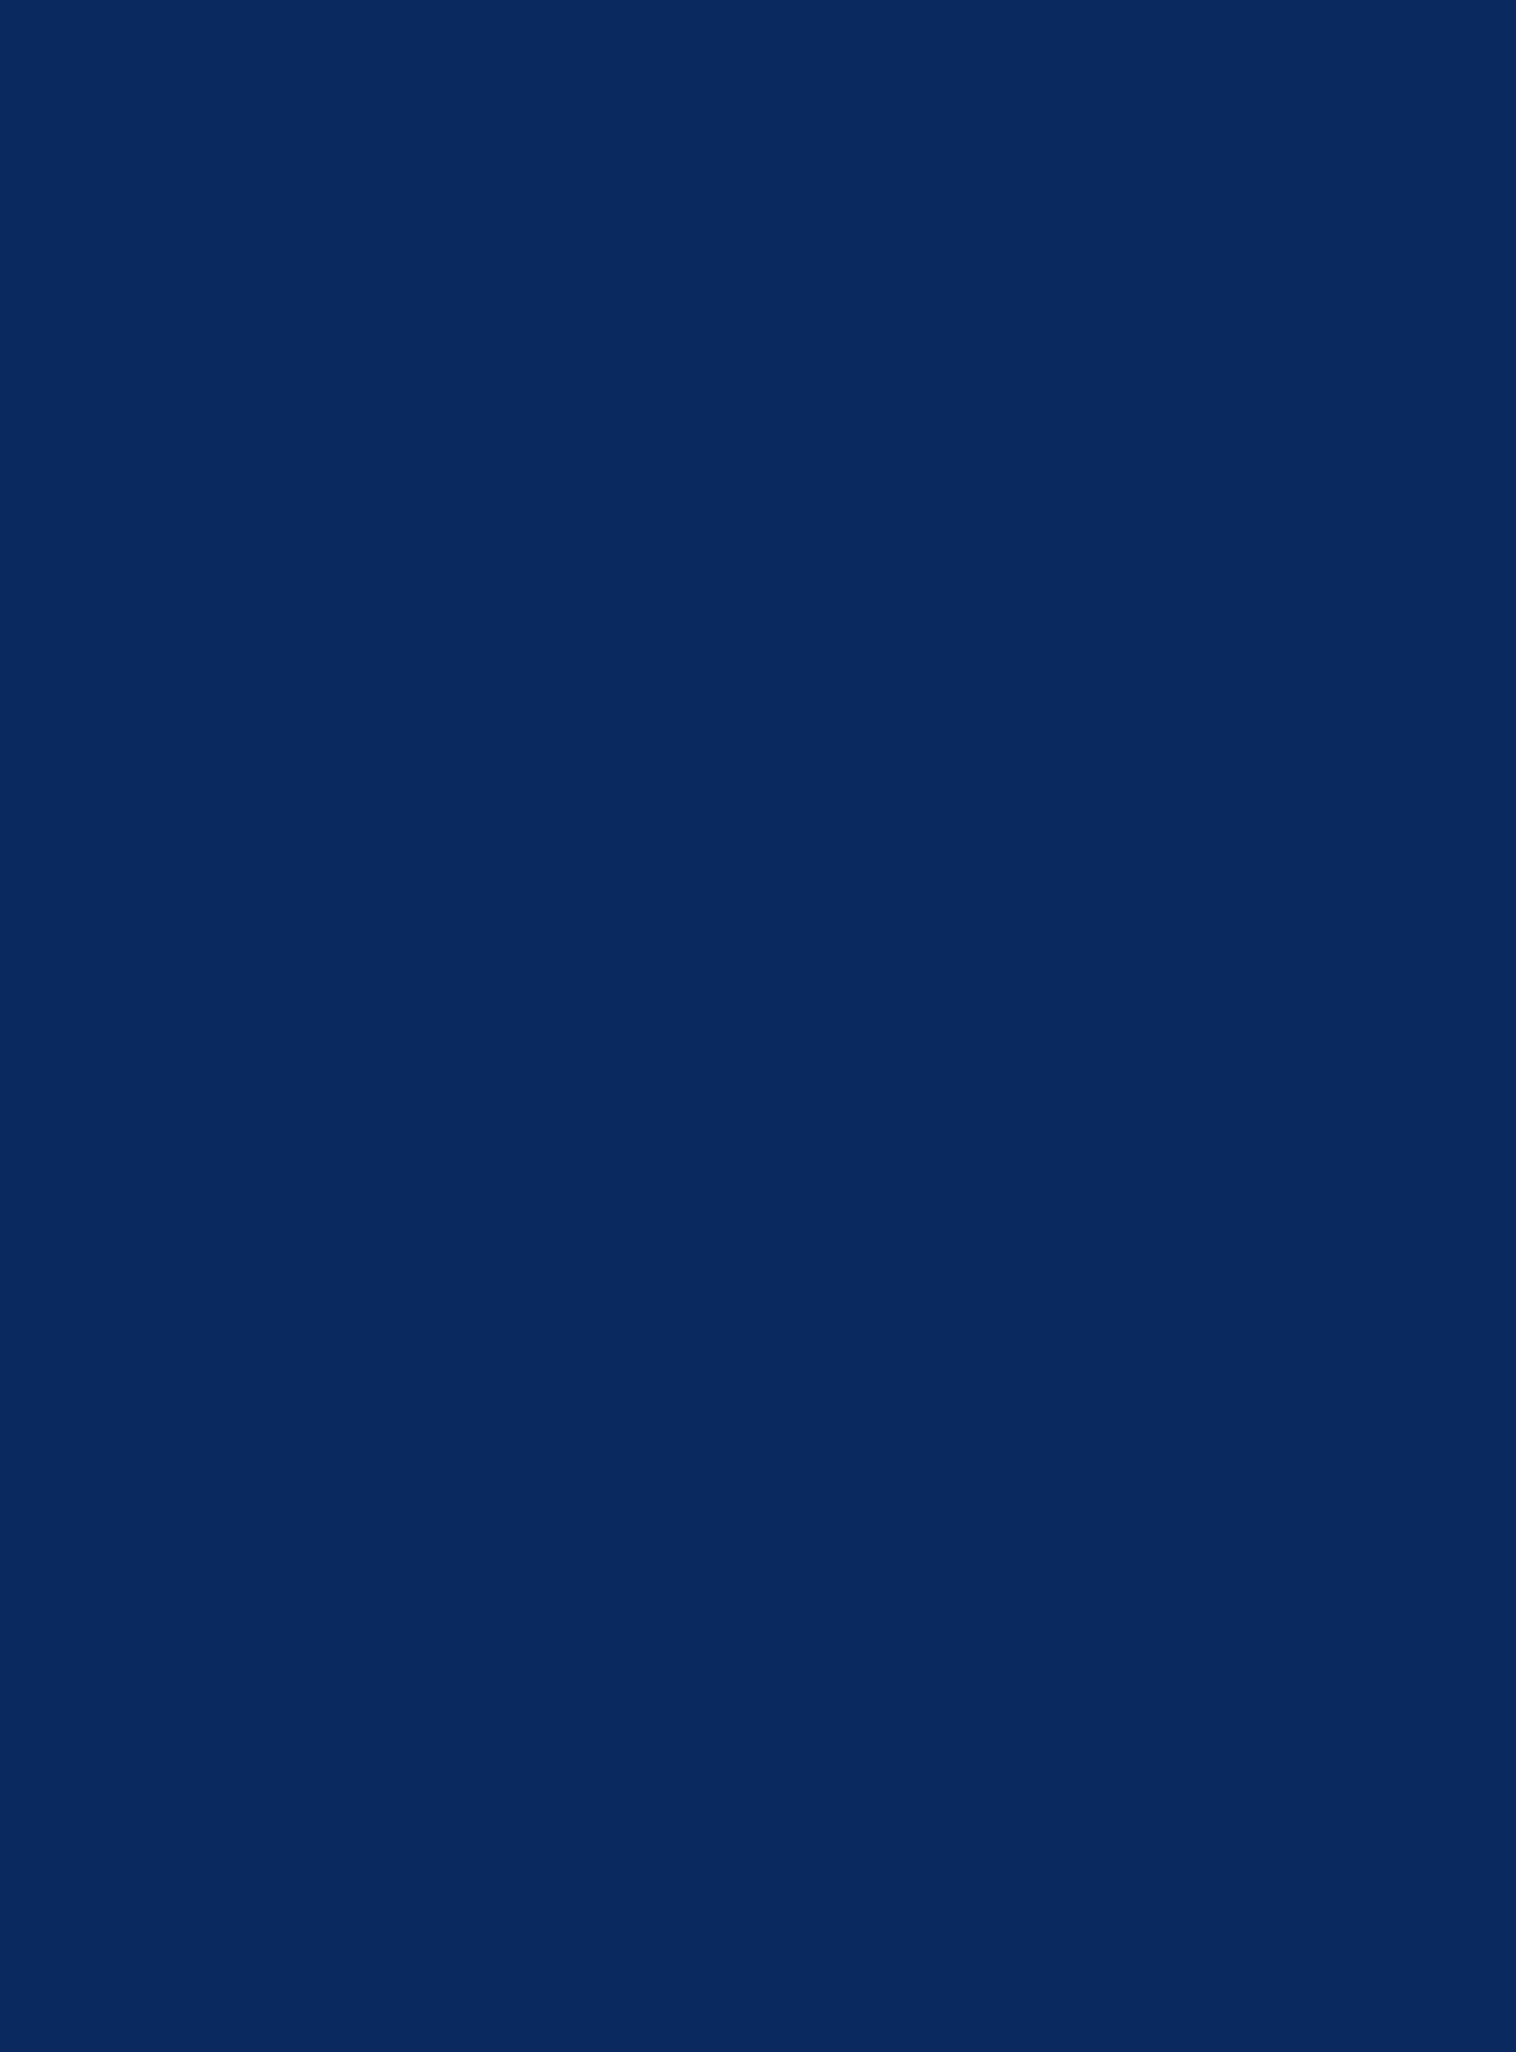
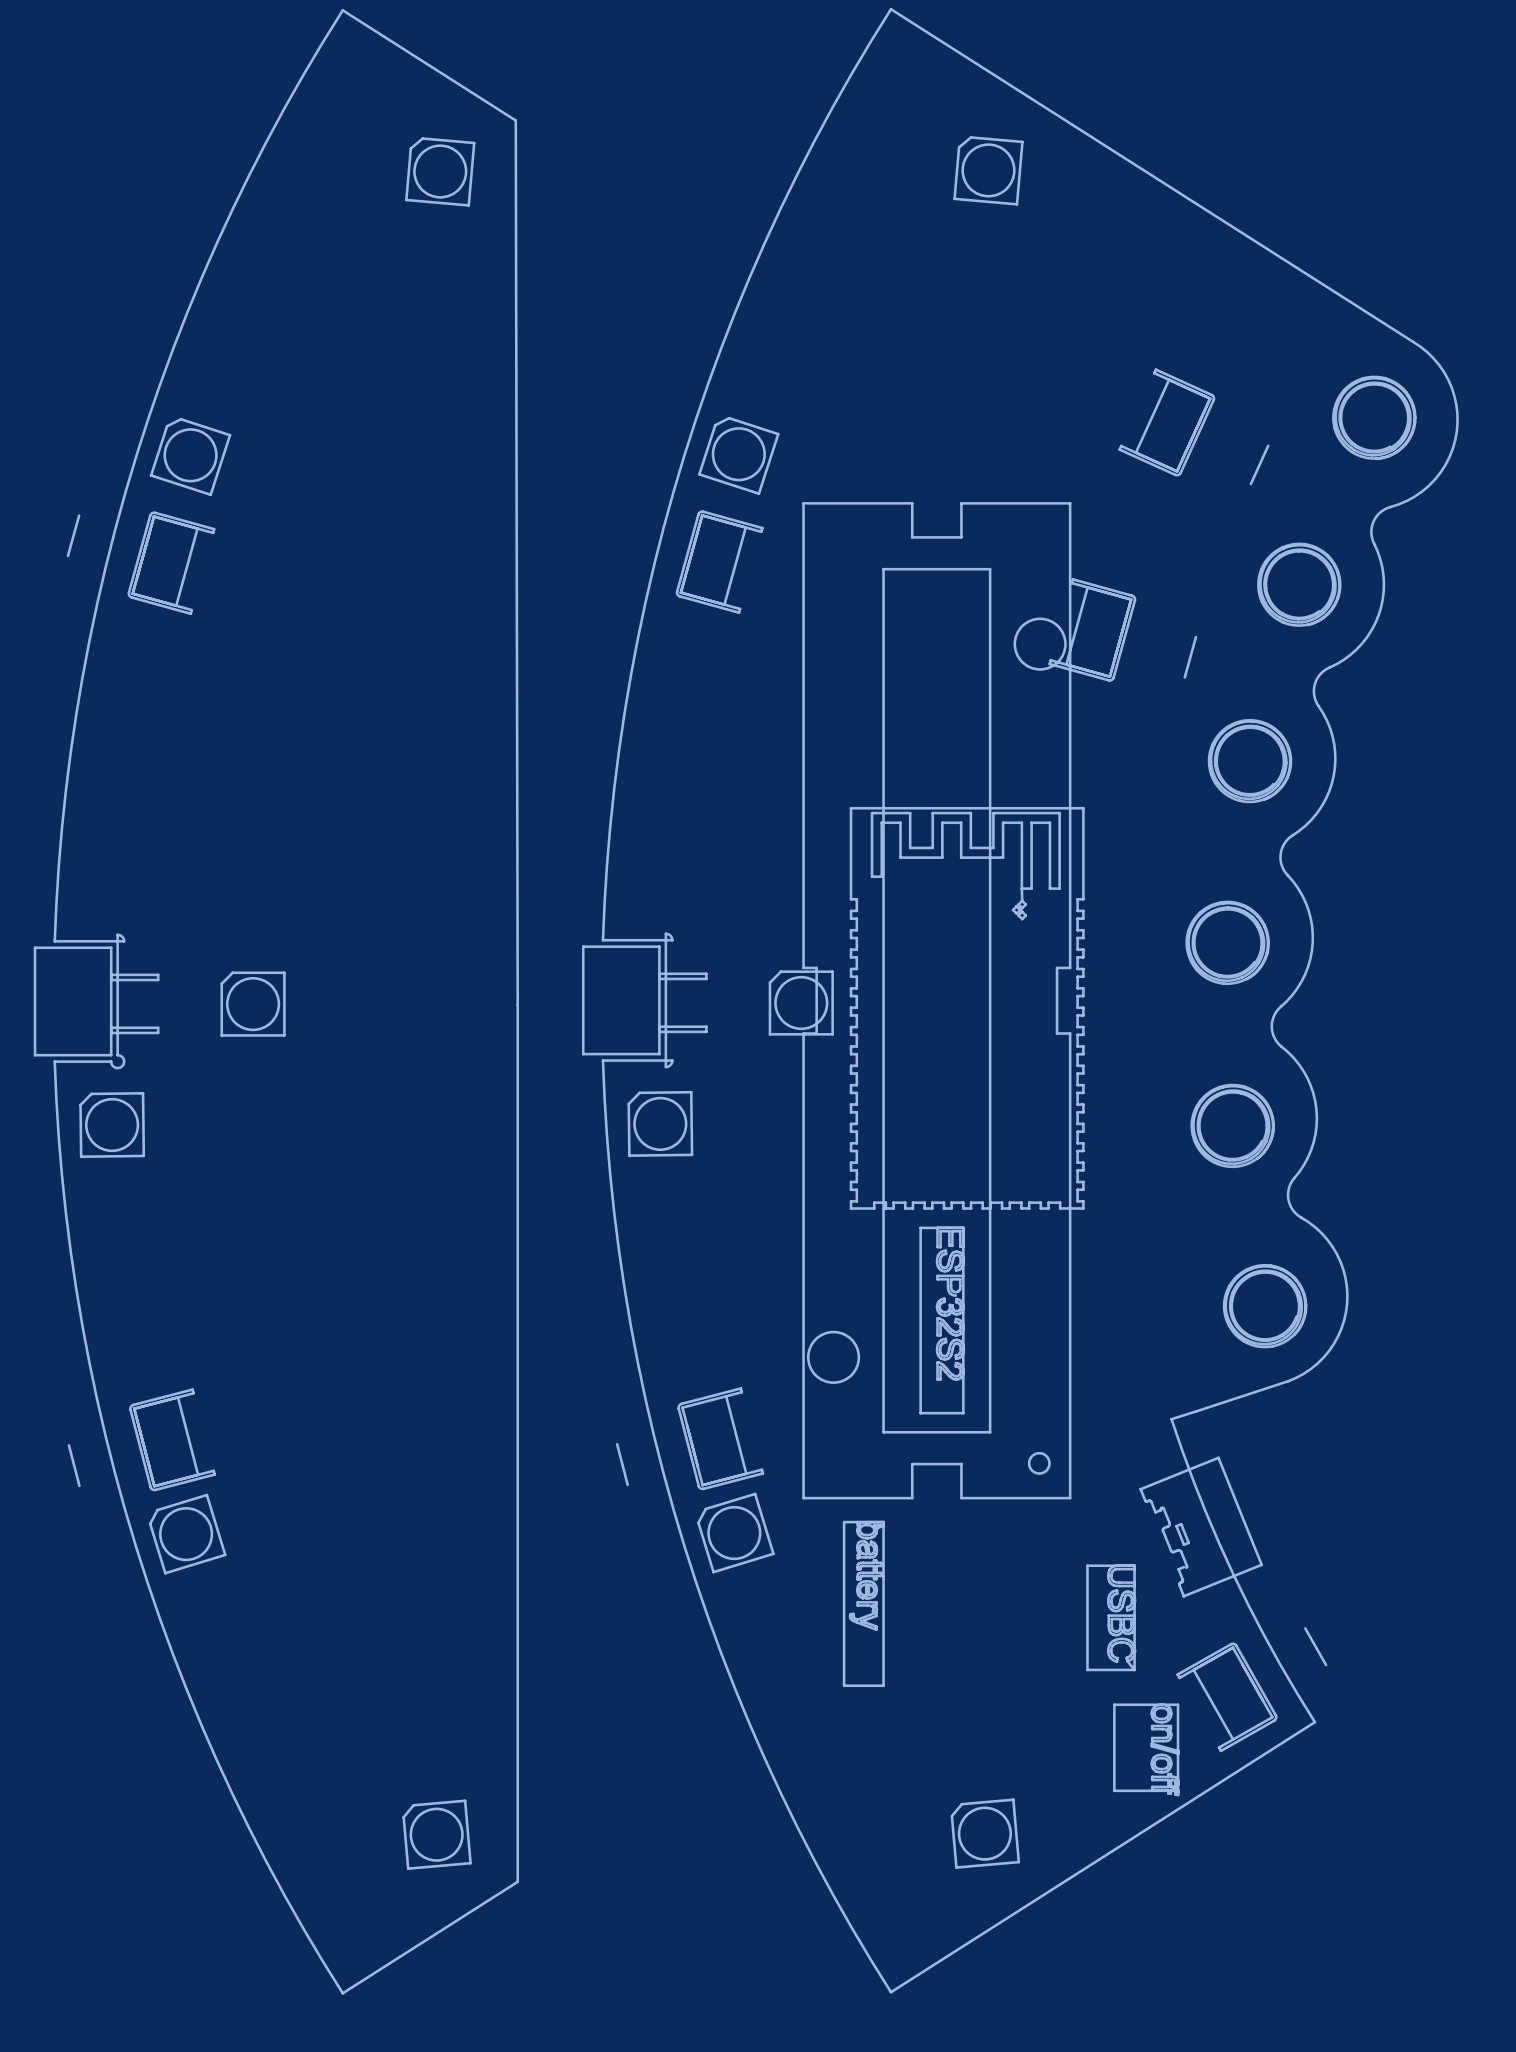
line: none -> (891, 9) (1420, 346) (1439, 365) (1448, 380) (1456, 405) (1457, 423) (1455, 440) (1449, 457) (1435, 479) (1414, 496) (1381, 511) (1373, 521) (1371, 537) (1380, 558) (1383, 574) (1381, 607) (1371, 630) (1362, 643) (1343, 659) (1323, 670) (1315, 681) (1314, 697) (1326, 720) (1334, 743) (1333, 776) (1321, 806) (1305, 825) (1287, 839) (1280, 854) (1283, 869) (1297, 888) (1308, 910) (1312, 942) (1305, 974) (1292, 995) (1274, 1014) (1272, 1030) (1277, 1042) (1293, 1058) (1307, 1078) (1315, 1101) (1316, 1117) (1311, 1150) (1304, 1164) (1290, 1183) (1288, 1199) (1295, 1213) (1315, 1227) (1327, 1239) (1340, 1261) (1345, 1277) (1347, 1294) (1344, 1320) (1338, 1336) (1329, 1350) (1317, 1363) (1303, 1373) (1288, 1381) (1171, 1419) (1194, 1482) (1233, 1575) (1280, 1664) (1314, 1722) (891, 1992) (832, 1894) (780, 1793) (749, 1723) (721, 1653) (684, 1545) (654, 1436) (637, 1361) (624, 1287) (610, 1174) (602, 1060) (672, 1060) (672, 1061) (670, 1065) (665, 1067) (665, 933) (671, 936) (672, 940) (603, 940) (610, 826) (624, 713) (637, 639) (663, 528) (684, 455) (708, 383) (749, 277) (780, 208) (814, 140) (851, 74) (891, 9)
line: none -> (342, 10) (515, 120) (517, 1004) (517, 1881) (342, 1993) (284, 1895) (232, 1794) (201, 1724) (173, 1654) (136, 1546) (115, 1473) (97, 1400) (76, 1288) (61, 1175) (54, 1061) (111, 1061) (112, 1066) (117, 1068) (124, 1062) (122, 1057) (117, 1055) (117, 934) (123, 937) (124, 941) (54, 941) (62, 827) (76, 714) (97, 603) (115, 529) (136, 456) (160, 384) (186, 313) (216, 243) (249, 175) (284, 108) (342, 10)
line: none -> (970, 137) (1022, 141) (1016, 204) (954, 198) (959, 147) (970, 137)
line: none -> (422, 138) (474, 143) (468, 205) (406, 199) (410, 148) (422, 138)
drawing: none -> [961, 143, 1016, 198]
drawing: none -> [413, 144, 468, 199]
line: none -> (1155, 369) (1154, 373) (1210, 398) (1177, 471) (1121, 446) (1119, 449) (1177, 475) (1213, 397) (1155, 369)
line: none -> (1169, 379) (1135, 452)
line: none -> (729, 418) (715, 425) (699, 474) (758, 493) (778, 434) (729, 418)
line: none -> (180, 419) (230, 435) (210, 494) (151, 475) (167, 426) (180, 419)
drawing: none -> [711, 427, 766, 482]
drawing: none -> [163, 428, 218, 483]
line: none -> (1268, 445) (1250, 484)
line: none -> (1394, 449) (1390, 446) (1373, 450) (1359, 447) (1348, 438) (1341, 423) (1342, 407) (1351, 393) (1365, 385) (1383, 385) (1397, 393) (1406, 406) (1407, 422) (1402, 437) (1396, 443) (1393, 445) (1391, 447) (1390, 447) (1389, 448) (1373, 452) (1357, 447) (1345, 437) (1340, 424) (1340, 409) (1345, 398) (1355, 388) (1368, 383) (1382, 383) (1395, 389) (1404, 399) (1410, 413) (1409, 427) (1403, 439) (1394, 449)
line: none -> (1394, 449) (1376, 455) (1358, 451) (1343, 440) (1336, 422) (1337, 404) (1347, 389) (1363, 379) (1382, 378) (1399, 387) (1411, 403) (1414, 424) (1406, 442) (1389, 455) (1370, 458) (1351, 451) (1338, 437) (1333, 421) (1335, 406) (1342, 392) (1354, 381) (1372, 376) (1390, 380) (1405, 391) (1413, 407) (1414, 424) (1407, 441) (1394, 453) (1384, 457) (1376, 458)
line: none -> (803, 503) (912, 503) (912, 537) (961, 537) (961, 503) (1070, 503) (1070, 967) (1057, 967) (1057, 1033) (1070, 1033) (1070, 1498) (961, 1498) (961, 1464) (912, 1464) (912, 1498) (803, 1498) (803, 1033) (816, 1033) (816, 967) (803, 967) (803, 503)
line: none -> (703, 511) (762, 528) (761, 531) (702, 515) (680, 592) (740, 608) (739, 612) (680, 596) (677, 593) (698, 514) (703, 511)
line: none -> (155, 512) (214, 529) (213, 532) (153, 516) (132, 593) (191, 610) (190, 613) (131, 597) (129, 594) (150, 515) (155, 512)
line: none -> (79, 515) (67, 556)
line: none -> (745, 527) (724, 604)
line: none -> (197, 528) (176, 605)
line: none -> (883, 569) (990, 569) (990, 1432) (883, 1432) (883, 569)
line: none -> (1073, 579) (1072, 583) (1131, 599) (1109, 676) (1050, 660) (1049, 664) (1111, 680) (1134, 598) (1073, 579)
line: none -> (1087, 587) (1066, 664)
line: none -> (1319, 611) (1303, 617) (1285, 614) (1272, 604) (1266, 588) (1268, 571) (1278, 558) (1295, 551) (1312, 553) (1325, 564) (1332, 580) (1330, 597) (1319, 612) (1304, 618) (1286, 617) (1272, 606) (1265, 590) (1266, 573) (1276, 558) (1292, 550) (1309, 551) (1325, 560) (1334, 577) (1333, 596) (1323, 612) (1306, 621) (1288, 621) (1271, 611) (1262, 595) (1261, 577) (1268, 560) (1282, 549) (1301, 545) (1319, 550) (1334, 565) (1339, 585) (1334, 604) (1320, 619) (1301, 625) (1281, 621) (1266, 609) (1259, 594) (1258, 579) (1263, 564) (1274, 552) (1291, 544) (1309, 545) (1325, 553) (1336, 568) (1340, 585) (1335, 603) (1324, 617) (1315, 622) (1307, 625)
drawing: none -> [1013, 617, 1067, 671]
line: none -> (1195, 637) (1184, 677)
line: none -> (1271, 787) (1273, 784) (1260, 792) (1247, 794) (1234, 790) (1225, 783) (1218, 771) (1216, 758) (1220, 746) (1228, 735) (1239, 729) (1253, 727) (1266, 731) (1276, 739) (1282, 750) (1283, 764) (1280, 776) (1271, 787)
line: none -> (1271, 787) (1255, 795) (1238, 793) (1223, 783) (1215, 767) (1216, 751) (1226, 735) (1241, 726) (1258, 726) (1276, 736) (1285, 753) (1284, 771) (1275, 788) (1258, 797) (1239, 797) (1222, 788) (1213, 772) (1211, 754) (1218, 737) (1233, 725) (1250, 721) (1269, 726) (1284, 740) (1290, 760) (1285, 780) (1271, 795) (1252, 801) (1232, 798) (1217, 786) (1210, 771) (1209, 756) (1214, 741) (1223, 729) (1239, 721) (1257, 720) (1273, 727) (1285, 740) (1290, 757) (1288, 776) (1283, 784) (1278, 790) (1271, 796) (1263, 799)
line: none -> (851, 808) (851, 899) (856, 899) (856, 910) (851, 910) (851, 918) (856, 918) (856, 930) (851, 930) (851, 938) (856, 938) (856, 949) (851, 949) (851, 957) (856, 957) (856, 968) (851, 968) (851, 976) (856, 976) (856, 988) (851, 988) (851, 996) (856, 996) (856, 1007) (851, 1007) (851, 1015) (856, 1015) (856, 1027) (851, 1027) (851, 1034) (856, 1034) (856, 1046) (851, 1046) (851, 1054) (856, 1054) (856, 1065) (851, 1065) (851, 1073) (856, 1073) (856, 1085) (851, 1085) (851, 1092) (856, 1092) (856, 1104) (851, 1104) (851, 1112) (856, 1112) (856, 1123) (851, 1123) (851, 1131) (856, 1131) (856, 1143) (851, 1143) (851, 1151) (856, 1151) (856, 1162) (851, 1162) (851, 1170) (856, 1170) (856, 1182) (851, 1182) (851, 1189) (856, 1189) (856, 1201) (851, 1201) (851, 1208) (874, 1208) (874, 1202) (885, 1202) (885, 1208) (893, 1208) (893, 1202) (905, 1202) (905, 1208) (912, 1208) (912, 1202) (924, 1202) (924, 1208) (932, 1208) (932, 1202) (943, 1202) (943, 1208) (951, 1208) (951, 1202) (963, 1202) (963, 1208) (971, 1208) (971, 1202) (982, 1202) (982, 1208) (990, 1208) (990, 1202) (1002, 1202) (1002, 1208) (1009, 1208) (1009, 1202) (1021, 1202) (1021, 1208) (1029, 1208) (1029, 1202) (1040, 1202) (1040, 1208) (1048, 1208) (1048, 1202) (1060, 1202) (1060, 1208) (1083, 1208) (1083, 1201) (1077, 1201) (1077, 1189) (1083, 1189) (1083, 1182) (1077, 1182) (1077, 1170) (1083, 1170) (1083, 1162) (1077, 1162) (1077, 1151) (1083, 1151) (1083, 1143) (1077, 1143) (1077, 1131) (1083, 1131) (1083, 1123) (1077, 1123) (1077, 1112) (1083, 1112) (1083, 1104) (1077, 1104) (1077, 1092) (1083, 1092) (1083, 1085) (1077, 1085) (1077, 1073) (1083, 1073) (1083, 1065) (1077, 1065) (1077, 1054) (1083, 1054) (1083, 1046) (1077, 1046) (1077, 1034) (1083, 1034) (1083, 1027) (1077, 1027) (1077, 1015) (1083, 1015) (1083, 1007) (1077, 1007) (1077, 996) (1083, 996) (1083, 988) (1077, 988) (1077, 976) (1083, 976) (1083, 968) (1077, 968) (1077, 957) (1083, 957) (1083, 949) (1077, 949) (1077, 938) (1083, 938) (1083, 930) (1077, 930) (1077, 918) (1083, 918) (1083, 910) (1077, 910) (1077, 899) (1083, 899) (1083, 808) (851, 808)
line: none -> (1021, 888) (1021, 822) (1003, 822) (1003, 857) (961, 857) (961, 822) (942, 822) (942, 857) (900, 857) (900, 822) (881, 822) (881, 876) (872, 876) (872, 813) (910, 813) (910, 847) (932, 847) (932, 813) (970, 813) (970, 847) (993, 847) (993, 813) (1059, 813) (1059, 888) (1049, 888) (1049, 822) (1031, 822) (1031, 888) (1021, 888)
line: none -> (1021, 888) (1022, 900)
line: none -> (1022, 900) (1013, 910) (1016, 913) (1020, 910)
line: none -> (1022, 900) (1025, 904) (1022, 908) (1018, 904)
line: none -> (1016, 906) (1025, 915) (1022, 919) (1018, 915) (1022, 911)
line: none -> (583, 946) (583, 1054) (659, 1054) (659, 946) (583, 946)
line: none -> (35, 947) (111, 947) (111, 1055) (35, 1055) (35, 947)
line: none -> (1254, 962) (1241, 973) (1223, 975) (1207, 969) (1196, 955) (1194, 939) (1200, 923) (1214, 912) (1230, 909) (1247, 915) (1258, 929) (1261, 946) (1255, 962) (1242, 973) (1225, 977) (1208, 971) (1196, 958) (1192, 942) (1197, 924) (1210, 912) (1227, 907) (1245, 912) (1259, 925) (1264, 943) (1258, 962) (1245, 975) (1228, 980) (1209, 976) (1195, 964) (1188, 947) (1190, 929) (1201, 913) (1217, 904) (1237, 904) (1255, 913) (1266, 931) (1267, 951) (1257, 969) (1241, 981) (1221, 983) (1204, 976) (1192, 963) (1187, 949) (1187, 933) (1194, 919) (1208, 906) (1225, 902) (1243, 905) (1258, 916) (1266, 931) (1268, 950) (1261, 966) (1254, 974) (1247, 979)
line: none -> (780, 971) (769, 982) (769, 1034) (832, 1034) (832, 971) (780, 971)
line: none -> (232, 972) (284, 972) (284, 1035) (221, 1035) (221, 983) (232, 972)
line: none -> (659, 973) (706, 973) (706, 978) (659, 978)
line: none -> (111, 974) (158, 974) (158, 980) (111, 980)
drawing: none -> [774, 975, 829, 1031]
drawing: none -> [225, 976, 281, 1032]
line: none -> (659, 1026) (706, 1026) (706, 1031) (659, 1031)
line: none -> (111, 1027) (158, 1027) (158, 1032) (111, 1032)
line: none -> (691, 1092) (639, 1092) (628, 1104) (629, 1155) (692, 1154) (691, 1092)
line: none -> (143, 1093) (91, 1093) (80, 1105) (81, 1156) (143, 1155) (143, 1093)
drawing: none -> [633, 1096, 688, 1152]
drawing: none -> [84, 1097, 140, 1153]
line: none -> (1262, 1141) (1250, 1153) (1233, 1159) (1217, 1155) (1204, 1143) (1199, 1127) (1202, 1110) (1214, 1097) (1230, 1092) (1247, 1095) (1261, 1107) (1266, 1124) (1263, 1141) (1252, 1154) (1235, 1160) (1217, 1157) (1204, 1145) (1198, 1130) (1200, 1111) (1211, 1097) (1227, 1090) (1245, 1092) (1261, 1104) (1268, 1121) (1266, 1140) (1255, 1155) (1238, 1163) (1219, 1161) (1204, 1151) (1195, 1135) (1194, 1117) (1202, 1101) (1217, 1089) (1236, 1086) (1255, 1093) (1269, 1109) (1272, 1128) (1266, 1148) (1252, 1161) (1232, 1166) (1214, 1162) (1200, 1151) (1193, 1138) (1191, 1123) (1196, 1107) (1208, 1093) (1224, 1085) (1243, 1086) (1259, 1094) (1269, 1108) (1273, 1126) (1269, 1144) (1263, 1152) (1257, 1158)
line: none -> (920, 1227) (920, 1413) (963, 1413) (963, 1227) (920, 1227)
line: none -> (937, 1227) (937, 1247) (940, 1247) (940, 1231) (949, 1231) (949, 1245) (952, 1245) (952, 1231) (960, 1231) (960, 1246) (963, 1246)
line: none -> (945, 1250) (946, 1253) (940, 1258) (941, 1266) (946, 1267) (951, 1254) (957, 1251) (963, 1257) (960, 1268) (956, 1270) (955, 1267) (959, 1265) (960, 1261) (959, 1256) (956, 1254) (954, 1256) (948, 1269) (943, 1271) (939, 1268) (937, 1256) (940, 1252) (945, 1250)
line: none -> (963, 1275) (937, 1275) (937, 1279) (948, 1279) (949, 1291) (955, 1295)
line: none -> (951, 1279) (951, 1290) (958, 1291) (960, 1279) (951, 1279)
line: none -> (944, 1298) (944, 1301) (939, 1305) (941, 1311) (948, 1311) (949, 1304) (952, 1305) (954, 1310) (959, 1310) (960, 1305) (956, 1302) (956, 1299) (962, 1303) (961, 1311) (956, 1314) (951, 1310) (947, 1315) (940, 1314) (937, 1309) (937, 1304) (944, 1298)
line: none -> (1296, 1316) (1286, 1331) (1270, 1338) (1254, 1337) (1239, 1327) (1232, 1312) (1233, 1295) (1243, 1280) (1258, 1273) (1275, 1274) (1290, 1283) (1298, 1299) (1297, 1316) (1288, 1331) (1272, 1339) (1254, 1339) (1240, 1330) (1231, 1315) (1231, 1297) (1239, 1281) (1254, 1272) (1273, 1271) (1290, 1280) (1300, 1296) (1300, 1315) (1291, 1332) (1276, 1342) (1257, 1343) (1240, 1335) (1229, 1321) (1225, 1303) (1231, 1286) (1244, 1272) (1262, 1266) (1282, 1270) (1298, 1284) (1305, 1302) (1301, 1323) (1289, 1338) (1271, 1346) (1252, 1345) (1237, 1336) (1228, 1324) (1224, 1309) (1226, 1293) (1235, 1277) (1250, 1267) (1269, 1265) (1286, 1271) (1299, 1283) (1305, 1301) (1304, 1318) (1299, 1328) (1294, 1335)
line: none -> (937, 1318) (937, 1335) (940, 1335) (940, 1322) (953, 1334) (958, 1334) (962, 1331) (963, 1324) (959, 1319) (955, 1318) (955, 1322) (959, 1323) (960, 1327) (959, 1330) (956, 1332) (937, 1318)
drawing: none -> [806, 1330, 861, 1384]
line: none -> (945, 1338) (946, 1342) (940, 1346) (941, 1354) (946, 1355) (951, 1342) (957, 1339) (963, 1346) (960, 1356) (956, 1358) (955, 1355) (959, 1353) (960, 1349) (959, 1345) (956, 1343) (954, 1344) (948, 1358) (943, 1359) (939, 1356) (937, 1344) (940, 1340) (945, 1338)
line: none -> (937, 1362) (937, 1379) (940, 1379) (940, 1366) (953, 1378) (958, 1379) (962, 1375) (963, 1368) (959, 1364) (955, 1363) (955, 1366) (959, 1367) (960, 1371) (959, 1374) (956, 1376) (937, 1362)
line: none -> (740, 1388) (741, 1392) (682, 1407) (702, 1485) (761, 1469) (762, 1473) (701, 1488) (678, 1406) (740, 1388)
line: none -> (192, 1389) (193, 1393) (134, 1408) (154, 1486) (213, 1470) (214, 1474) (152, 1489) (130, 1407) (133, 1404) (192, 1389)
line: none -> (726, 1396) (746, 1473)
line: none -> (177, 1397) (198, 1474)
line: none -> (617, 1444) (627, 1484)
line: none -> (68, 1445) (79, 1485)
drawing: none -> [1027, 1451, 1051, 1475]
line: none -> (755, 1493) (705, 1509) (698, 1522) (713, 1572) (773, 1553) (755, 1493)
line: none -> (206, 1495) (225, 1554) (165, 1573) (150, 1523) (157, 1510) (206, 1495)
drawing: none -> [707, 1505, 762, 1561]
drawing: none -> [158, 1507, 214, 1562]
line: none -> (1160, 1509) (1163, 1508) (1169, 1523) (1162, 1529) (1171, 1550) (1180, 1550) (1186, 1567)
line: none -> (1160, 1510) (1155, 1512) (1150, 1501) (1145, 1500) (1140, 1489) (1218, 1457) (1261, 1564) (1183, 1596) (1179, 1585) (1182, 1580) (1178, 1569) (1183, 1567)
line: none -> (844, 1522) (883, 1522) (883, 1685) (844, 1685) (844, 1522)
line: none -> (857, 1522) (857, 1525) (860, 1525) (857, 1532) (861, 1537) (873, 1537) (876, 1531) (876, 1529) (876, 1528) (876, 1528) (876, 1527) (874, 1525) (883, 1525) (874, 1530)
line: none -> (1181, 1524) (1176, 1526) (1183, 1544) (1188, 1542) (1181, 1524)
line: none -> (874, 1530) (872, 1533) (867, 1535) (861, 1533) (859, 1529) (862, 1526) (867, 1525) (872, 1526) (874, 1530)
line: none -> (862, 1541) (857, 1545) (860, 1554) (857, 1555) (857, 1558) (874, 1556) (876, 1550) (875, 1543) (871, 1541) (874, 1550) (869, 1554) (867, 1544) (862, 1541)
line: none -> (862, 1544) (860, 1546) (860, 1551) (867, 1554) (865, 1546) (862, 1544)
line: none -> (1119, 1565) (1113, 1566) (1109, 1569) (1108, 1576) (1110, 1582) (1116, 1585) (1134, 1586)
line: none -> (873, 1569) (876, 1569) (876, 1565) (882, 1565) (881, 1562) (876, 1562) (876, 1560) (873, 1560) (873, 1562) (859, 1563) (857, 1569) (860, 1569) (861, 1566) (873, 1565) (873, 1572) (859, 1573) (857, 1579) (860, 1579) (861, 1576) (873, 1576) (873, 1579) (876, 1579) (876, 1576) (882, 1576) (881, 1572) (876, 1572) (876, 1570) (873, 1570)
line: none -> (1134, 1569) (1115, 1569) (1111, 1575) (1115, 1582) (1134, 1582)
line: none -> (866, 1581) (860, 1582) (857, 1587) (858, 1594) (863, 1598) (863, 1595) (859, 1590) (862, 1585) (866, 1584) (866, 1598) (873, 1596) (876, 1591) (874, 1583) (866, 1581)
line: none -> (868, 1584) (868, 1595) (872, 1593) (874, 1590) (872, 1586) (868, 1584)
line: none -> (1117, 1590) (1117, 1593) (1111, 1598) (1112, 1606) (1118, 1606) (1122, 1594) (1128, 1591) (1134, 1597) (1132, 1608) (1127, 1610) (1127, 1607) (1130, 1605) (1131, 1601) (1131, 1596) (1128, 1594) (1125, 1596) (1120, 1609) (1115, 1611) (1110, 1608) (1109, 1596) (1112, 1592) (1117, 1590)
line: none -> (857, 1602) (876, 1602) (876, 1605) (873, 1605) (876, 1608) (876, 1612) (872, 1611) (871, 1606) (857, 1605) (857, 1602)
line: none -> (876, 1612) (876, 1615) (861, 1621) (876, 1626) (876, 1629) (853, 1621) (850, 1617) (850, 1614) (853, 1613) (853, 1617) (857, 1619) (876, 1612)
line: none -> (1134, 1615) (1108, 1615) (1108, 1627) (1110, 1633) (1116, 1635) (1122, 1630) (1126, 1633) (1130, 1633) (1134, 1625)
line: none -> (1111, 1619) (1120, 1619) (1118, 1631) (1112, 1629) (1111, 1619)
line: none -> (1123, 1619) (1131, 1619) (1129, 1630) (1124, 1628) (1123, 1619)
line: none -> (1305, 1628) (1326, 1664)
line: none -> (1230, 1644) (1177, 1674) (1179, 1677) (1232, 1647) (1272, 1717) (1219, 1747) (1220, 1750) (1274, 1720) (1276, 1717) (1236, 1645) (1230, 1644)
line: none -> (1127, 1661) (1134, 1669)
line: none -> (1127, 1661) (1126, 1657) (1131, 1652) (1130, 1645) (1122, 1642) (1113, 1645) (1111, 1652) (1117, 1658) (1116, 1661) (1111, 1658) (1108, 1653) (1108, 1646) (1112, 1641) (1122, 1638) (1132, 1643) (1134, 1654) (1127, 1661)
line: none -> (1134, 1669) (1134, 1565) (1087, 1565) (1087, 1669) (1134, 1669)
line: none -> (1193, 1669) (1233, 1739)
line: none -> (1161, 1704) (1168, 1706) (1171, 1712) (1169, 1719) (1162, 1722) (1155, 1720) (1151, 1714) (1154, 1707) (1161, 1704)
line: none -> (1161, 1708) (1155, 1709) (1154, 1715) (1158, 1718) (1164, 1718) (1168, 1715) (1168, 1711) (1161, 1708)
line: none -> (1152, 1725) (1152, 1729) (1165, 1729) (1168, 1734) (1165, 1737) (1152, 1738) (1152, 1741) (1170, 1739) (1171, 1733) (1168, 1728) (1170, 1728) (1170, 1725) (1152, 1725)
line: none -> (1151, 1743) (1151, 1746) (1178, 1753) (1178, 1751) (1151, 1743)
line: none -> (1161, 1754) (1154, 1757) (1151, 1764) (1155, 1770) (1162, 1772) (1169, 1769) (1171, 1762) (1168, 1756) (1161, 1754)
line: none -> (1161, 1758) (1155, 1760) (1154, 1765) (1158, 1768) (1164, 1768) (1168, 1766) (1168, 1762) (1161, 1758)
line: none -> (1168, 1783) (1170, 1783) (1170, 1780) (1173, 1780) (1175, 1784) (1178, 1785) (1177, 1779) (1170, 1776) (1170, 1774) (1168, 1774) (1168, 1776) (1152, 1776) (1152, 1780) (1168, 1780) (1168, 1786) (1152, 1786) (1152, 1790) (1168, 1790) (1168, 1793) (1170, 1793) (1170, 1790) (1173, 1790) (1175, 1794) (1178, 1795) (1178, 1791) (1177, 1788) (1175, 1787) (1173, 1786) (1173, 1786) (1172, 1786) (1170, 1786) (1170, 1784) (1168, 1784) (1178, 1790)
line: none -> (1178, 1790) (1114, 1790) (1114, 1704) (1178, 1704) (1178, 1790)
line: none -> (1013, 1799) (1018, 1862) (956, 1867) (951, 1816) (961, 1804) (1013, 1799)
line: none -> (465, 1800) (470, 1863) (408, 1868) (403, 1817) (413, 1805) (465, 1800)
drawing: none -> [957, 1806, 1012, 1861]
drawing: none -> [409, 1807, 464, 1862]

